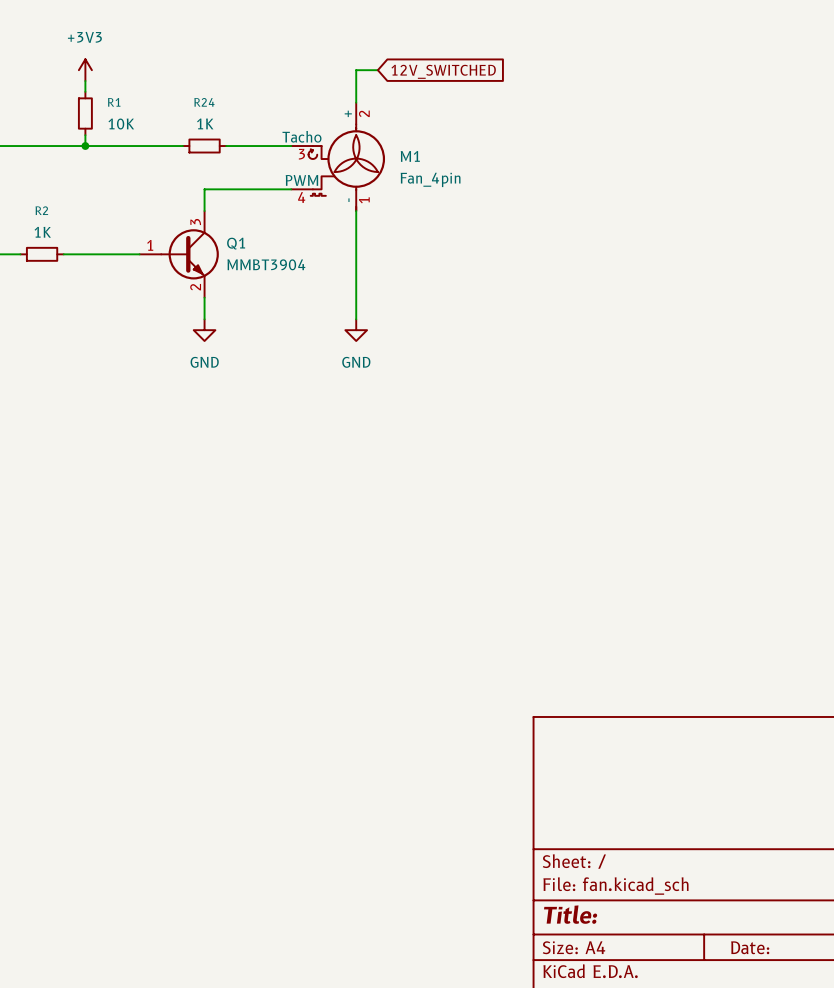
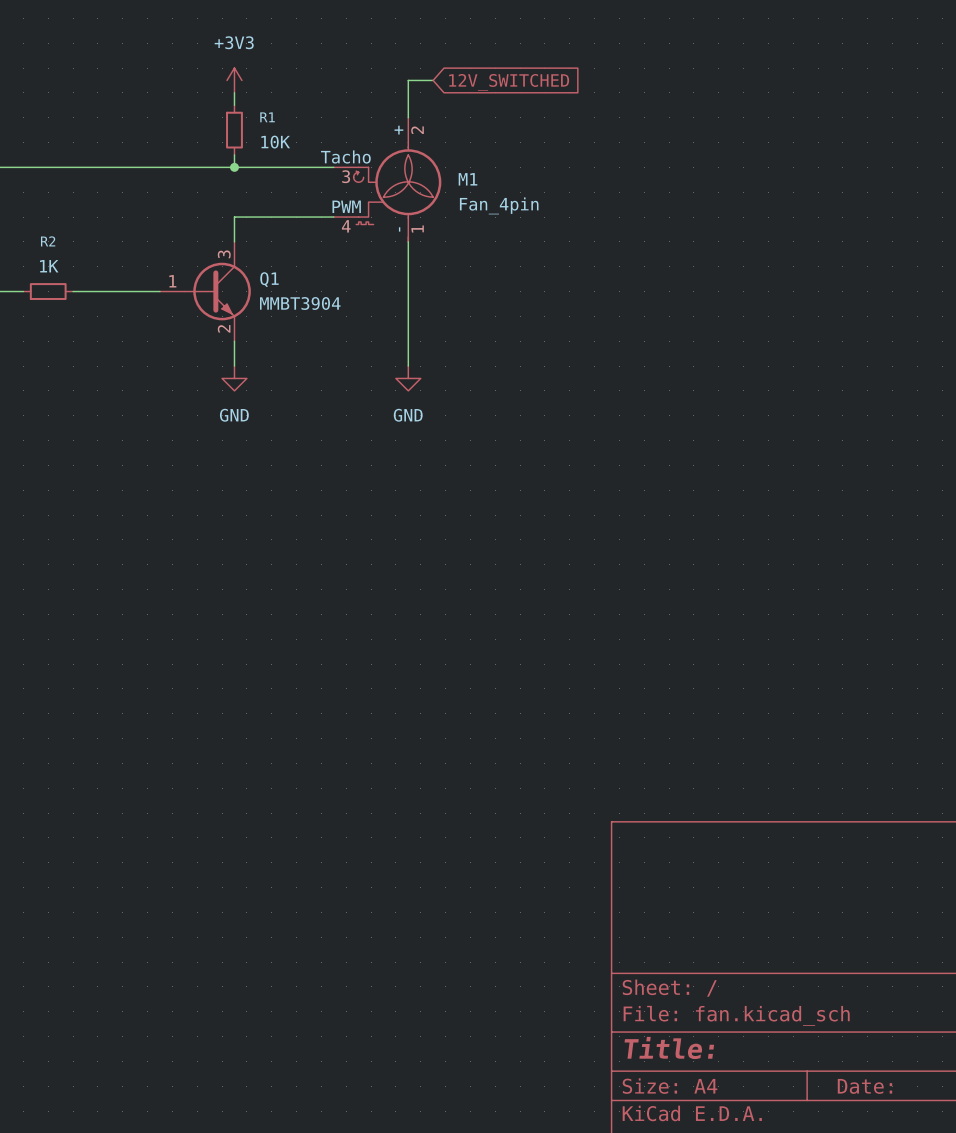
power symbol position: +3V3 (85, 70) -> +3V3 (234, 80)
wire: (85, 81) (85, 91) -> (234, 92) (234, 105)
R1 position: (85, 113) -> (234, 130)
wire: (85, 135) (85, 146) -> (234, 154) (234, 167)
junction: (85, 146) -> none
wire: none -> (209, 167) (259, 167)
junction: none -> (234, 167)
R24: 1K (204, 146) -> none

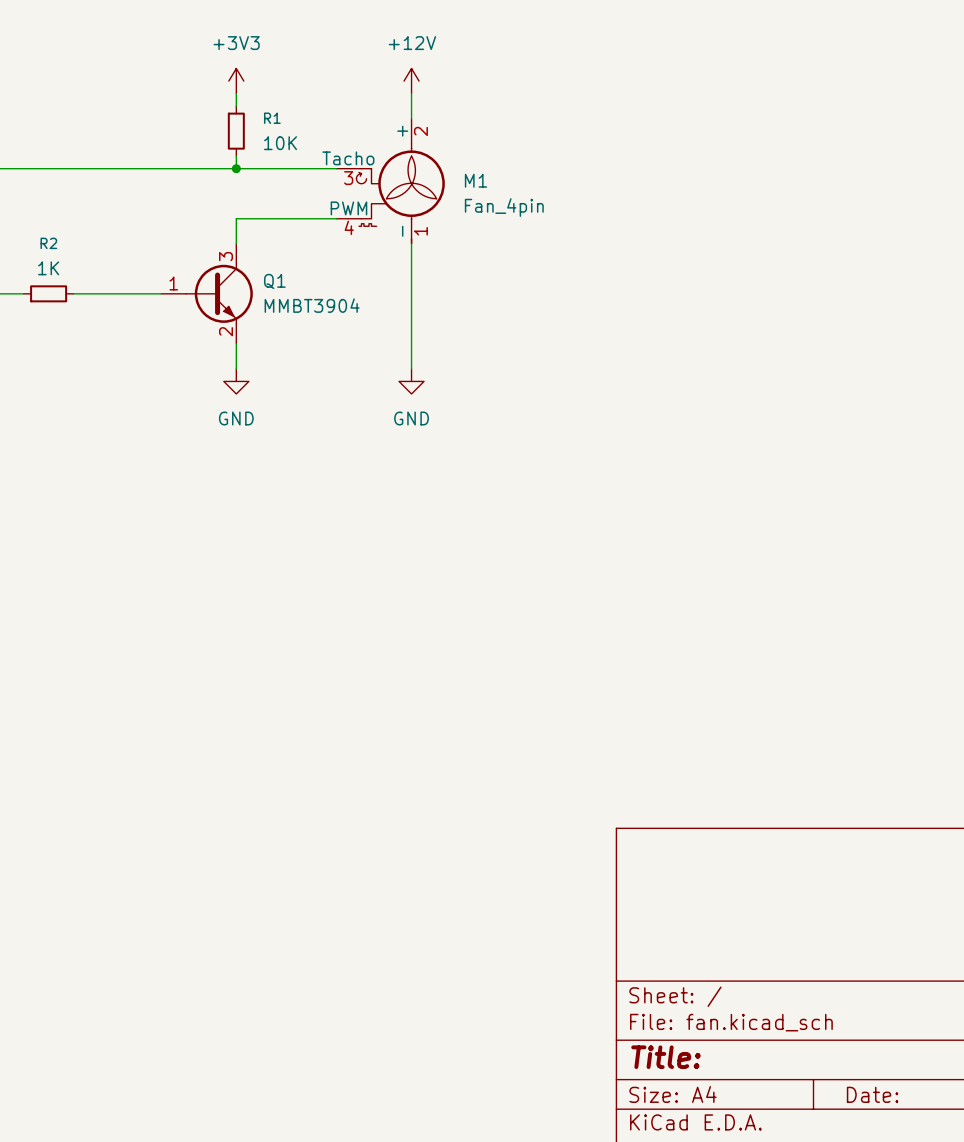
power symbol: none -> +12V (411, 81)
wire: (433, 80) (408, 80) (408, 92) -> none
global label: 12V_SWITCHED (509, 82) -> none

